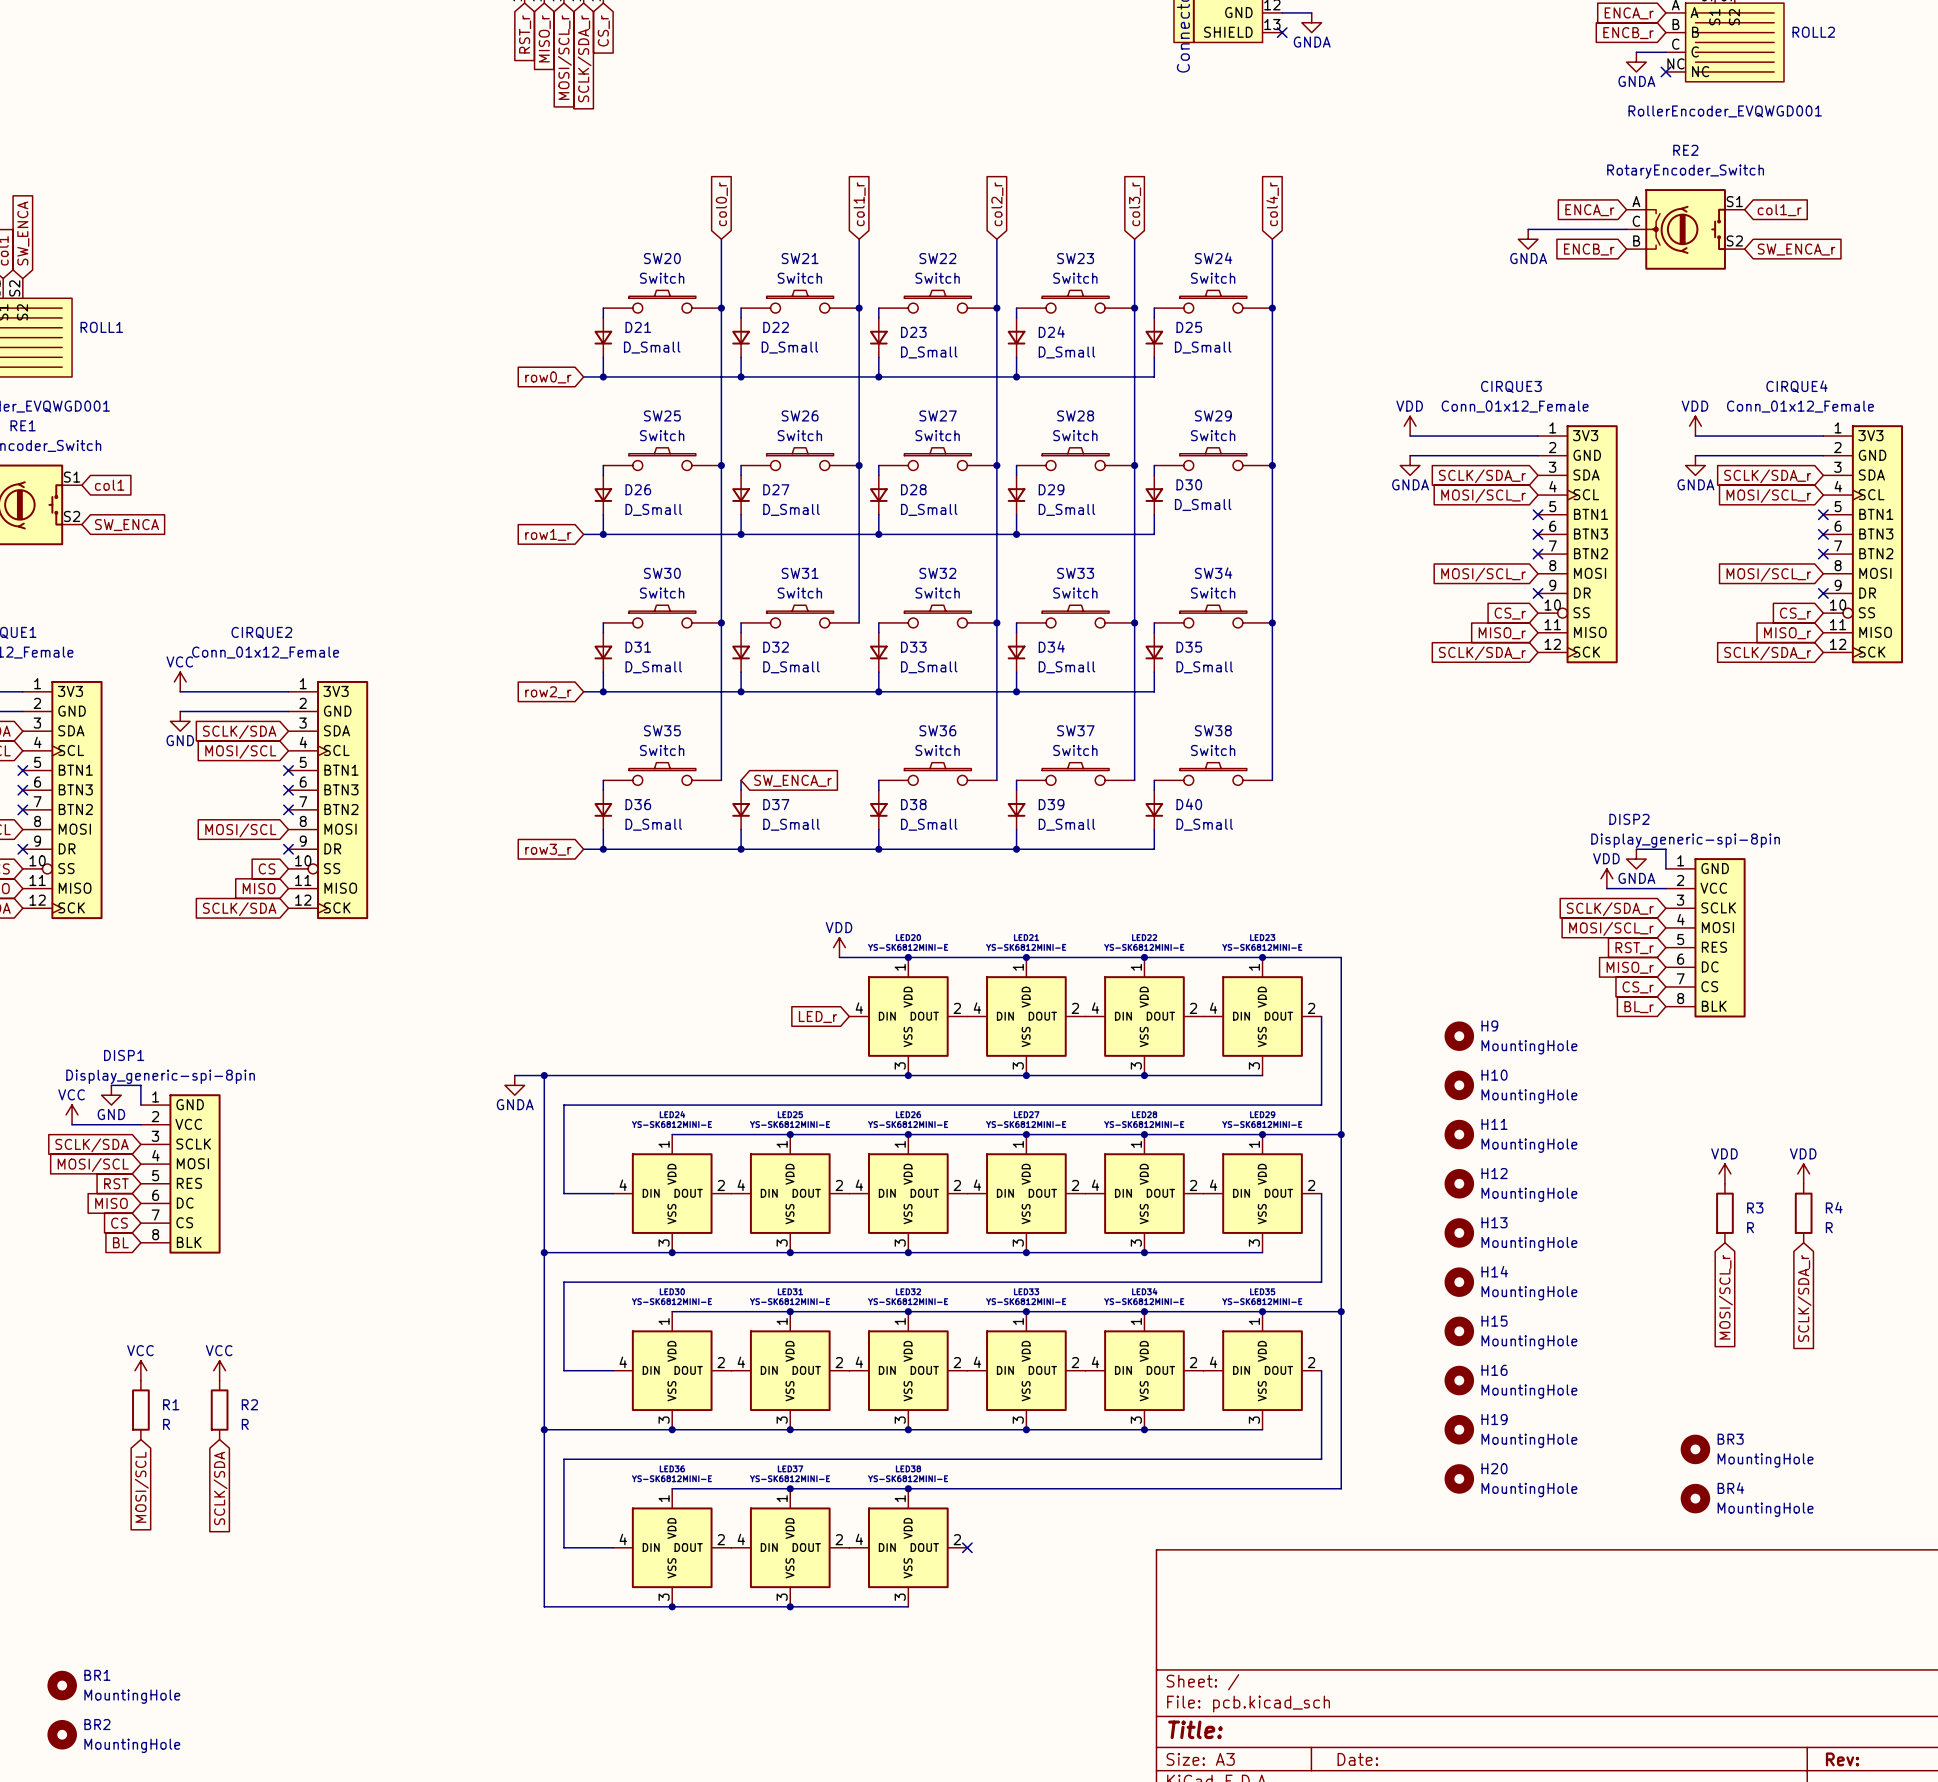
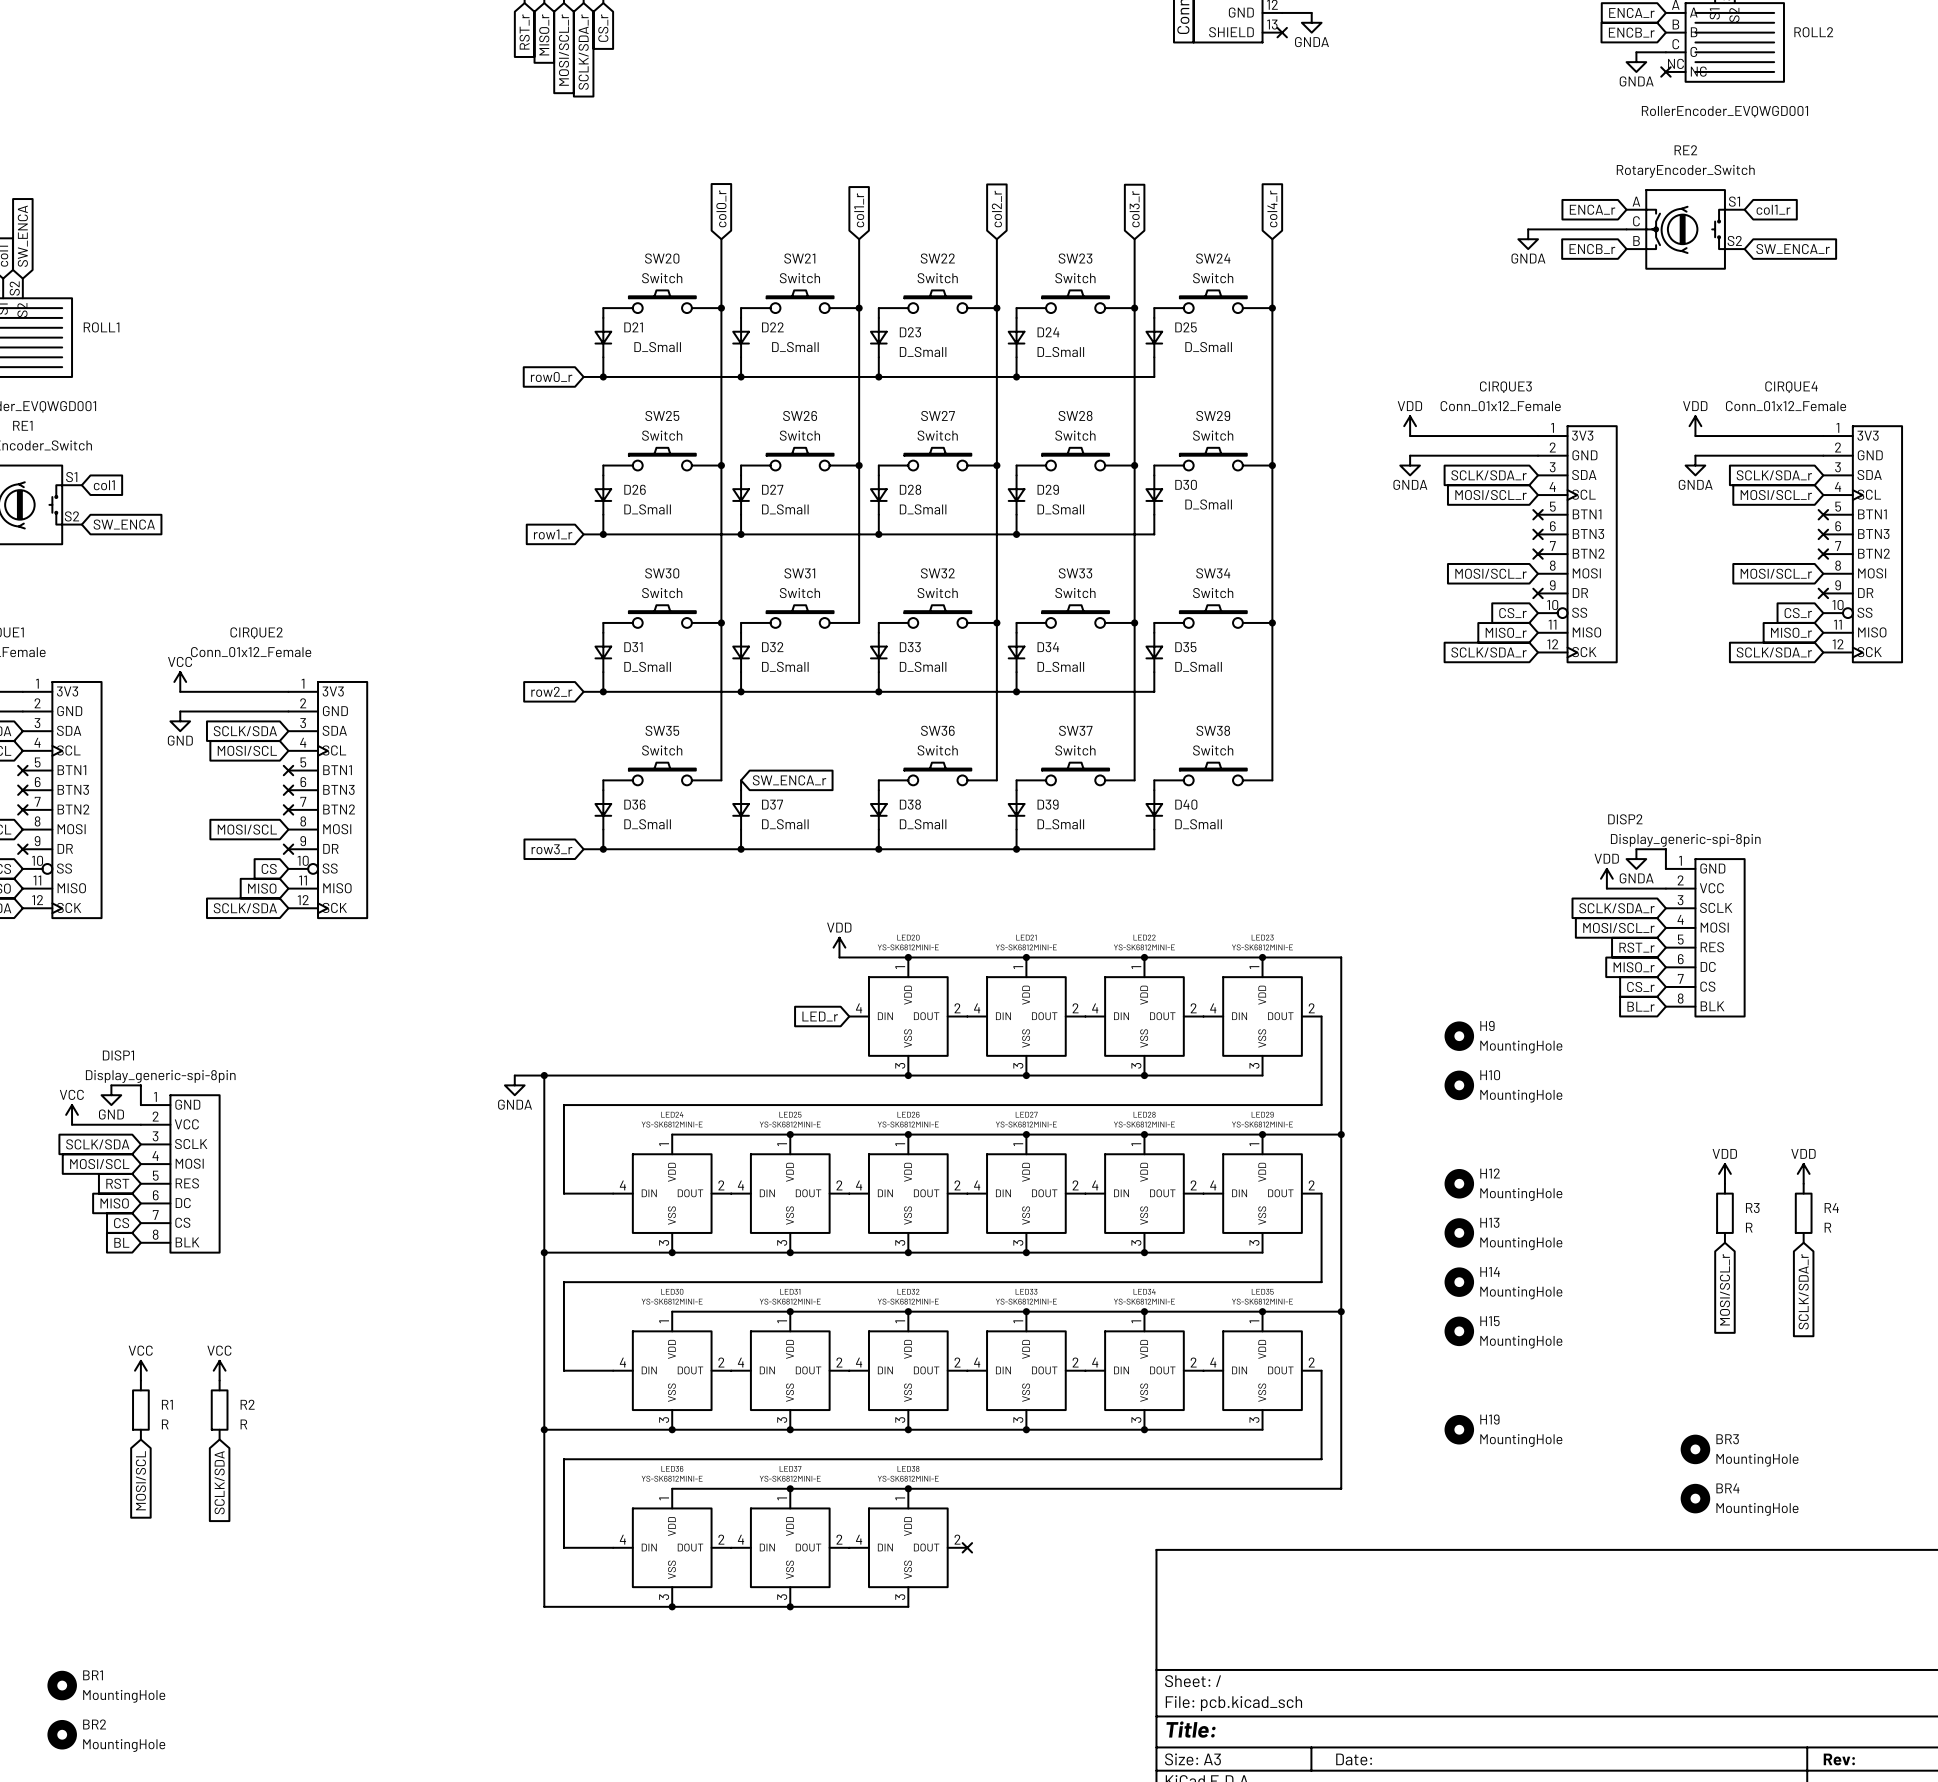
H11: MountingHole (1459, 1134) -> none
H16: MountingHole (1459, 1380) -> none
H20: MountingHole (1459, 1478) -> none

